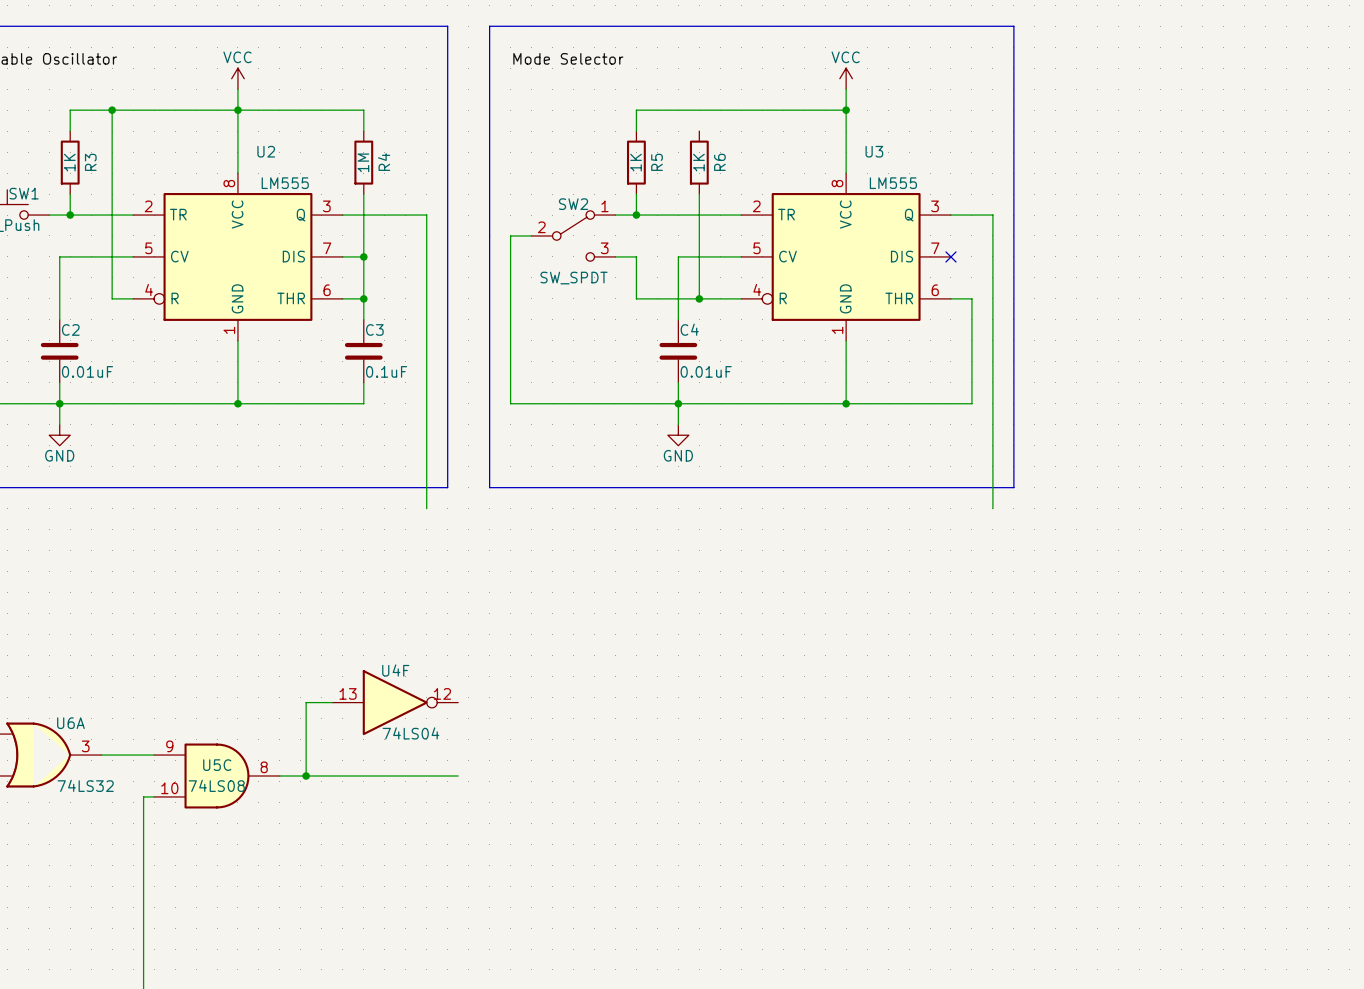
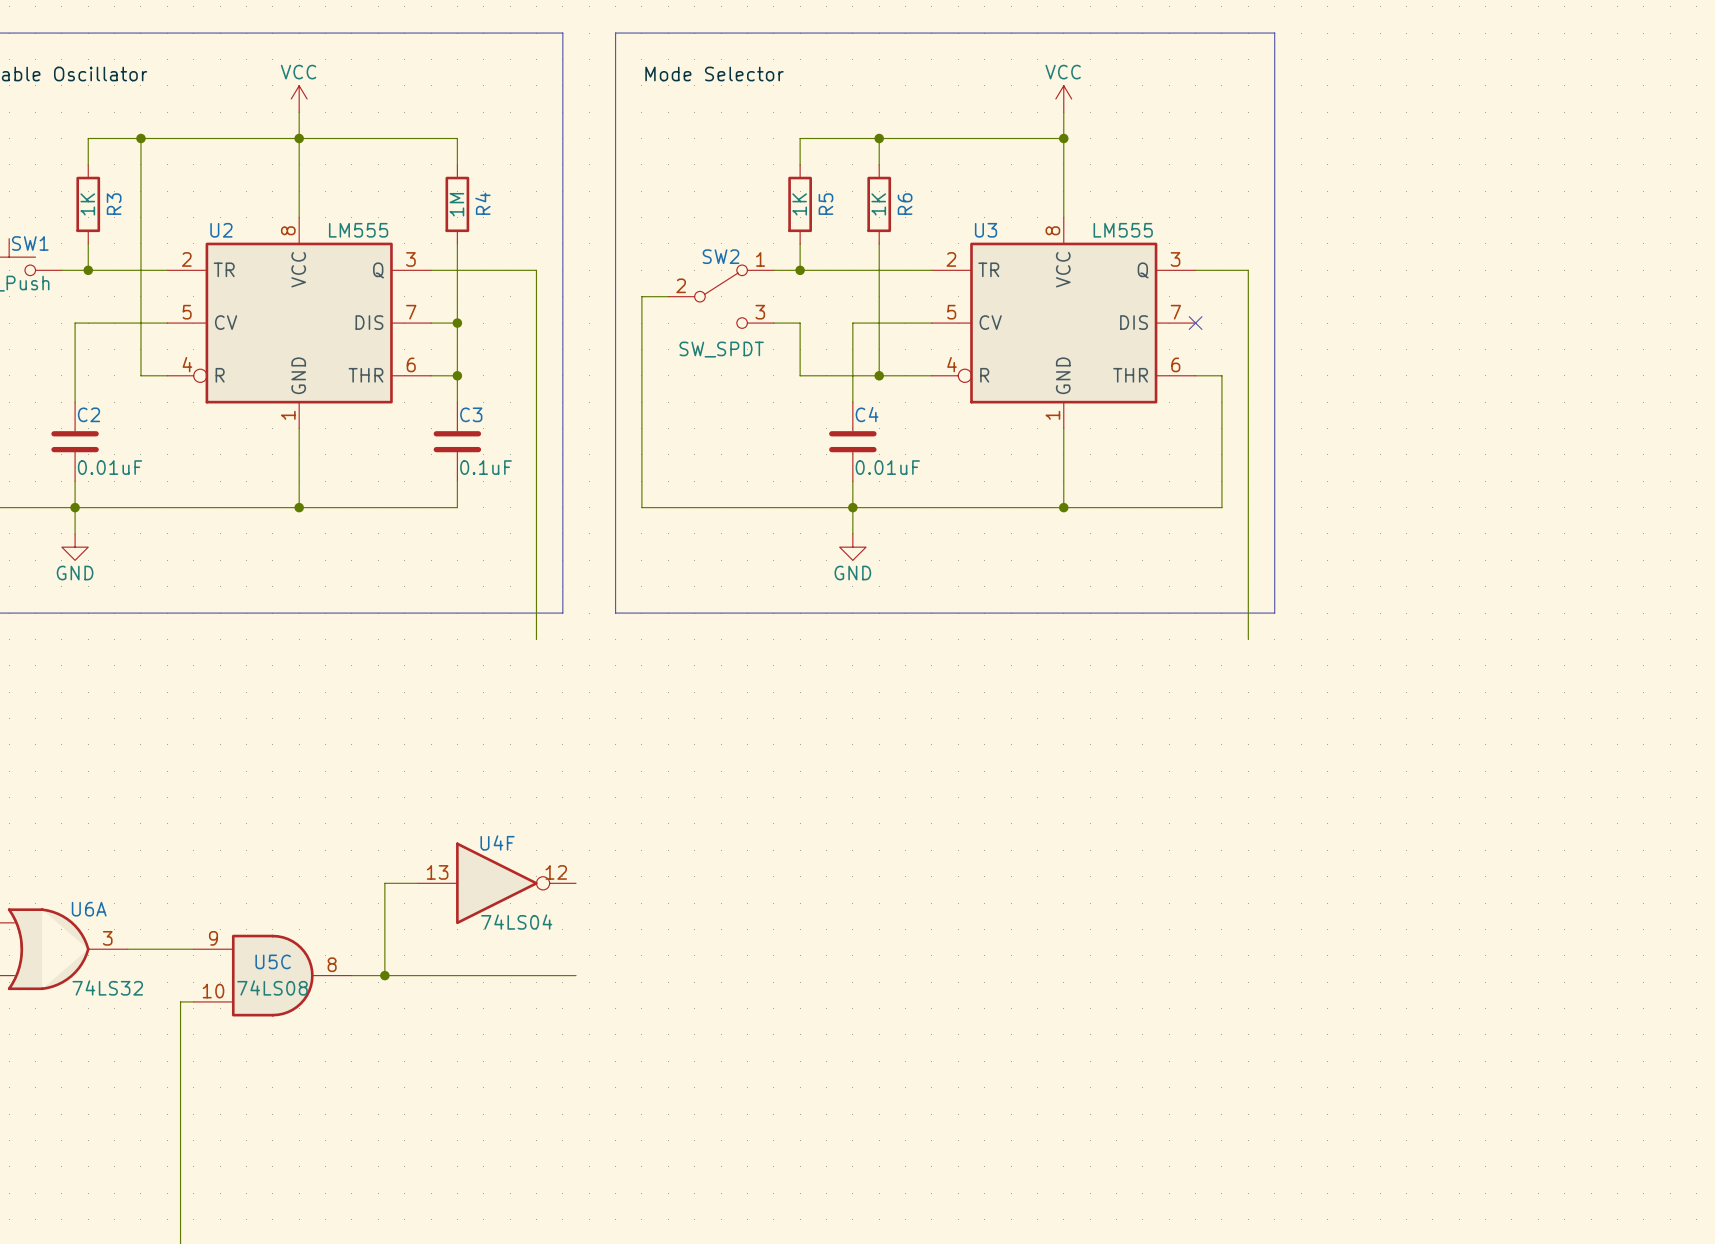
wire: none -> (879, 138) (879, 164)
junction: none -> (879, 138)
U2 name position: U2 (266, 151) -> U2 (221, 230)
U3 name position: U3 (874, 151) -> U3 (986, 230)

